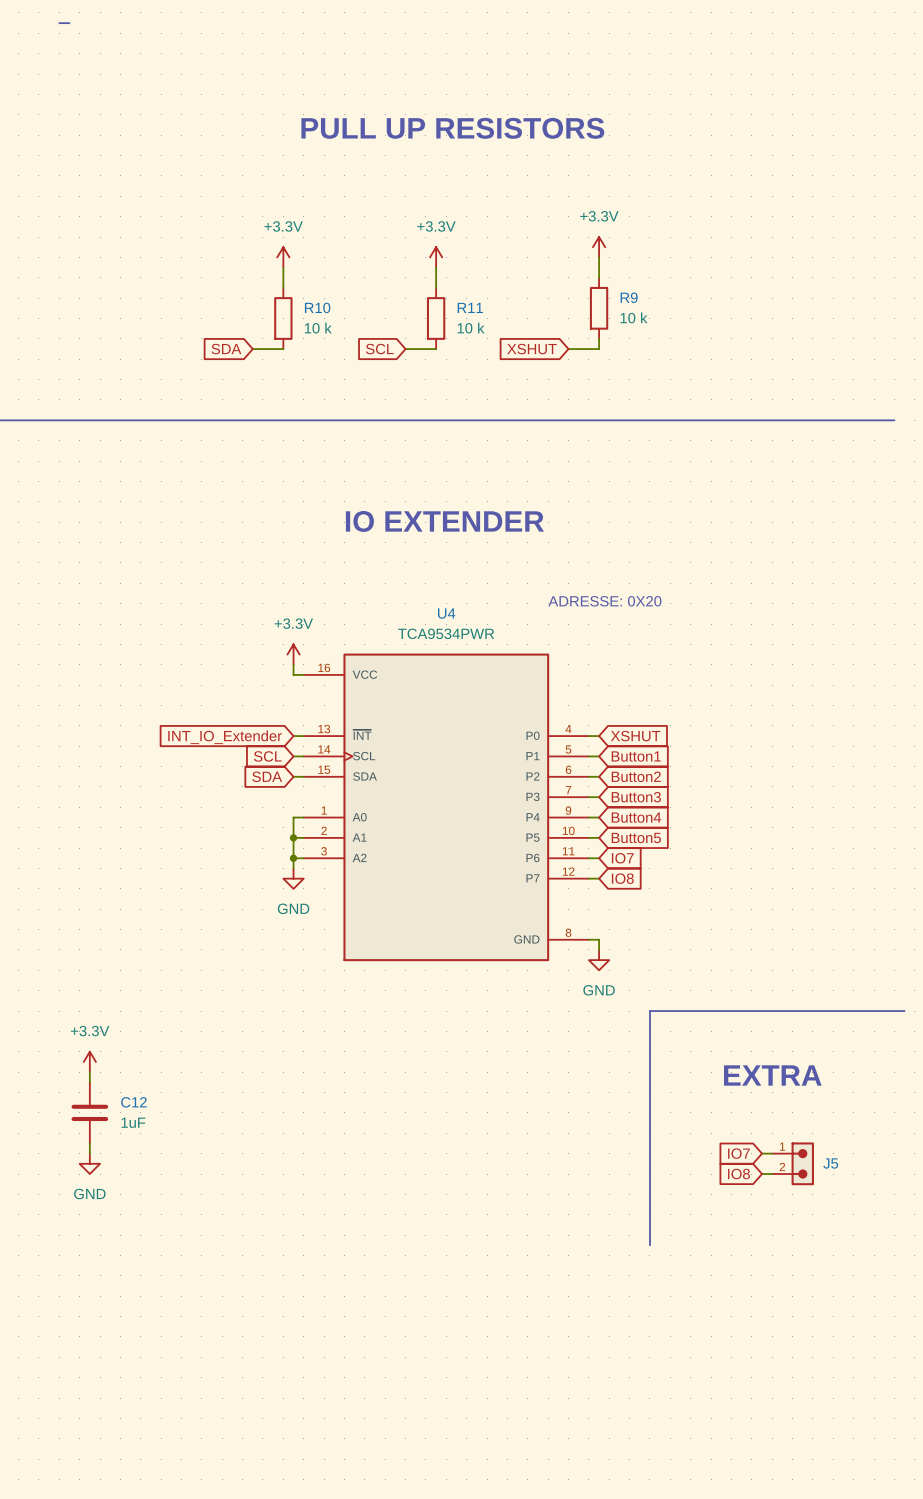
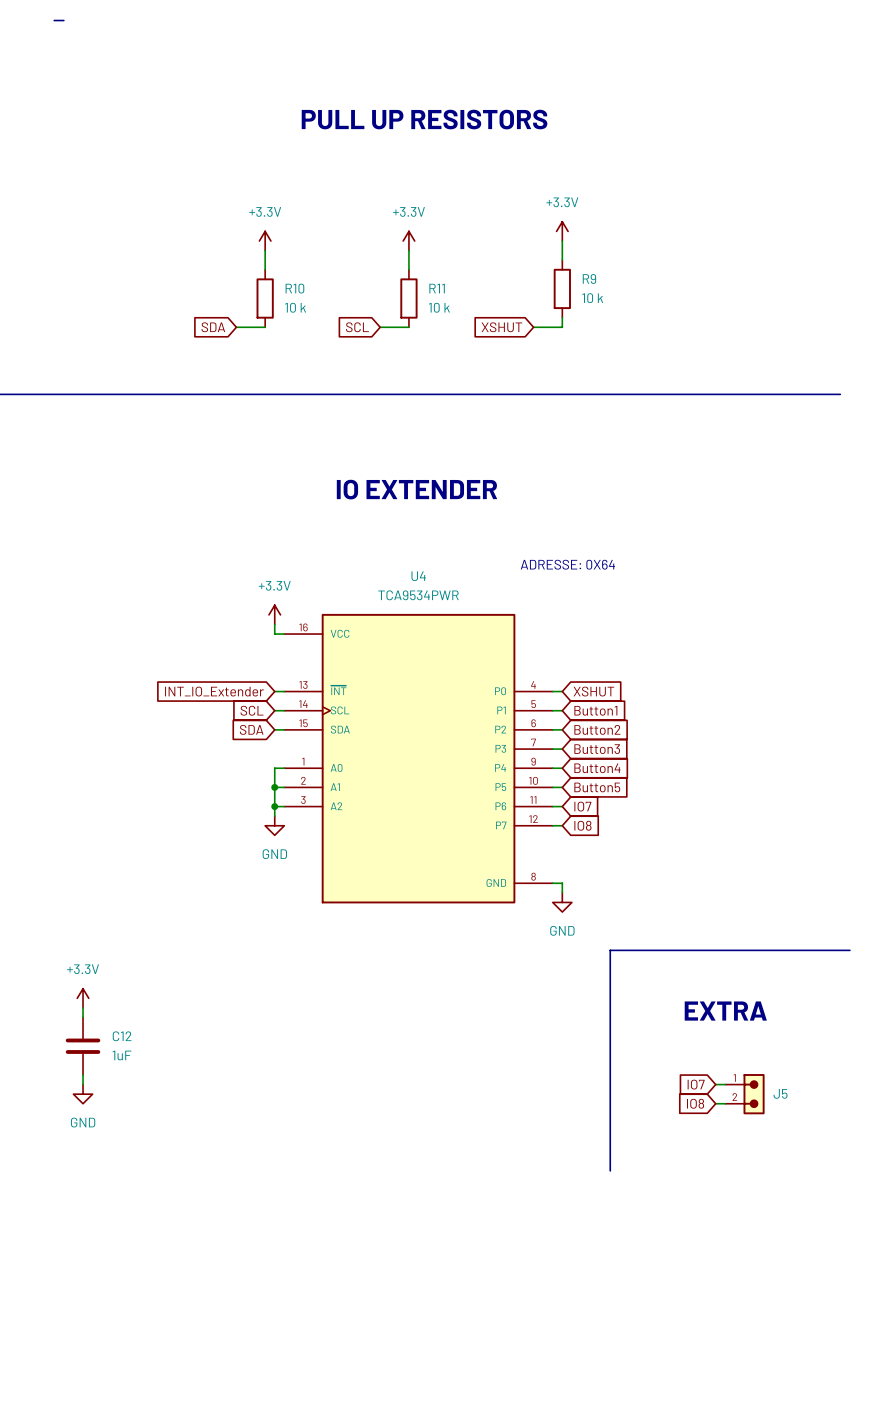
text: ADRESSE: 0X20 (604, 601) -> ADRESSE: 0X64 (567, 564)

